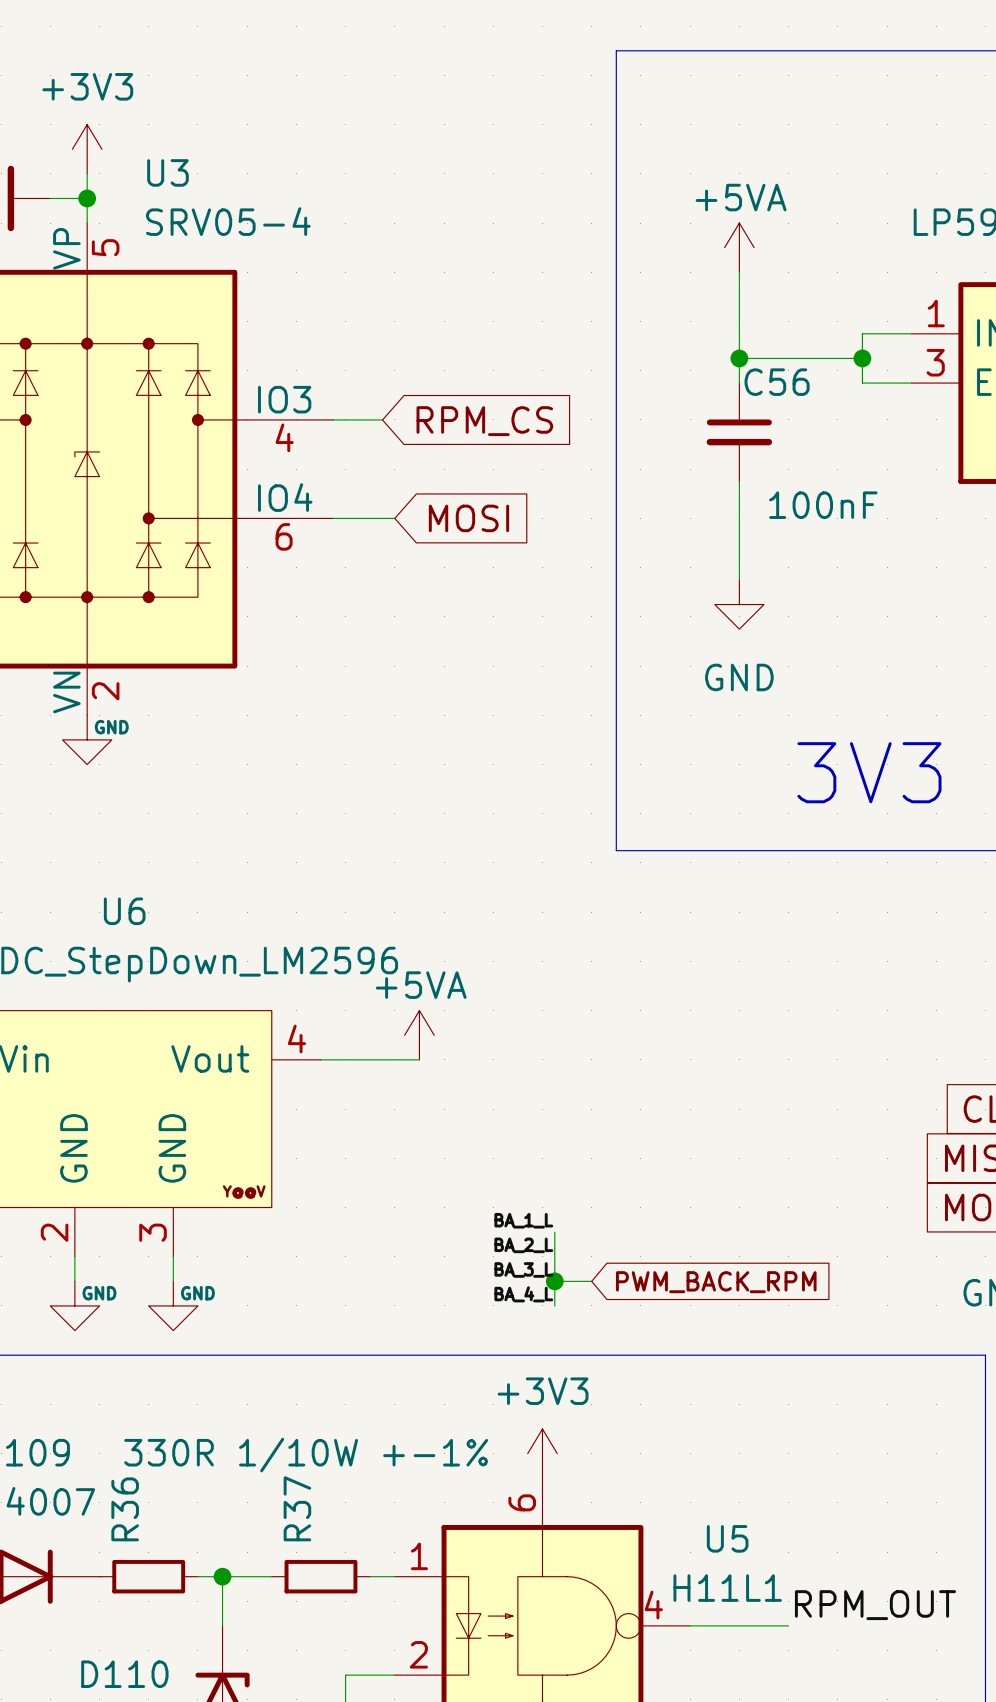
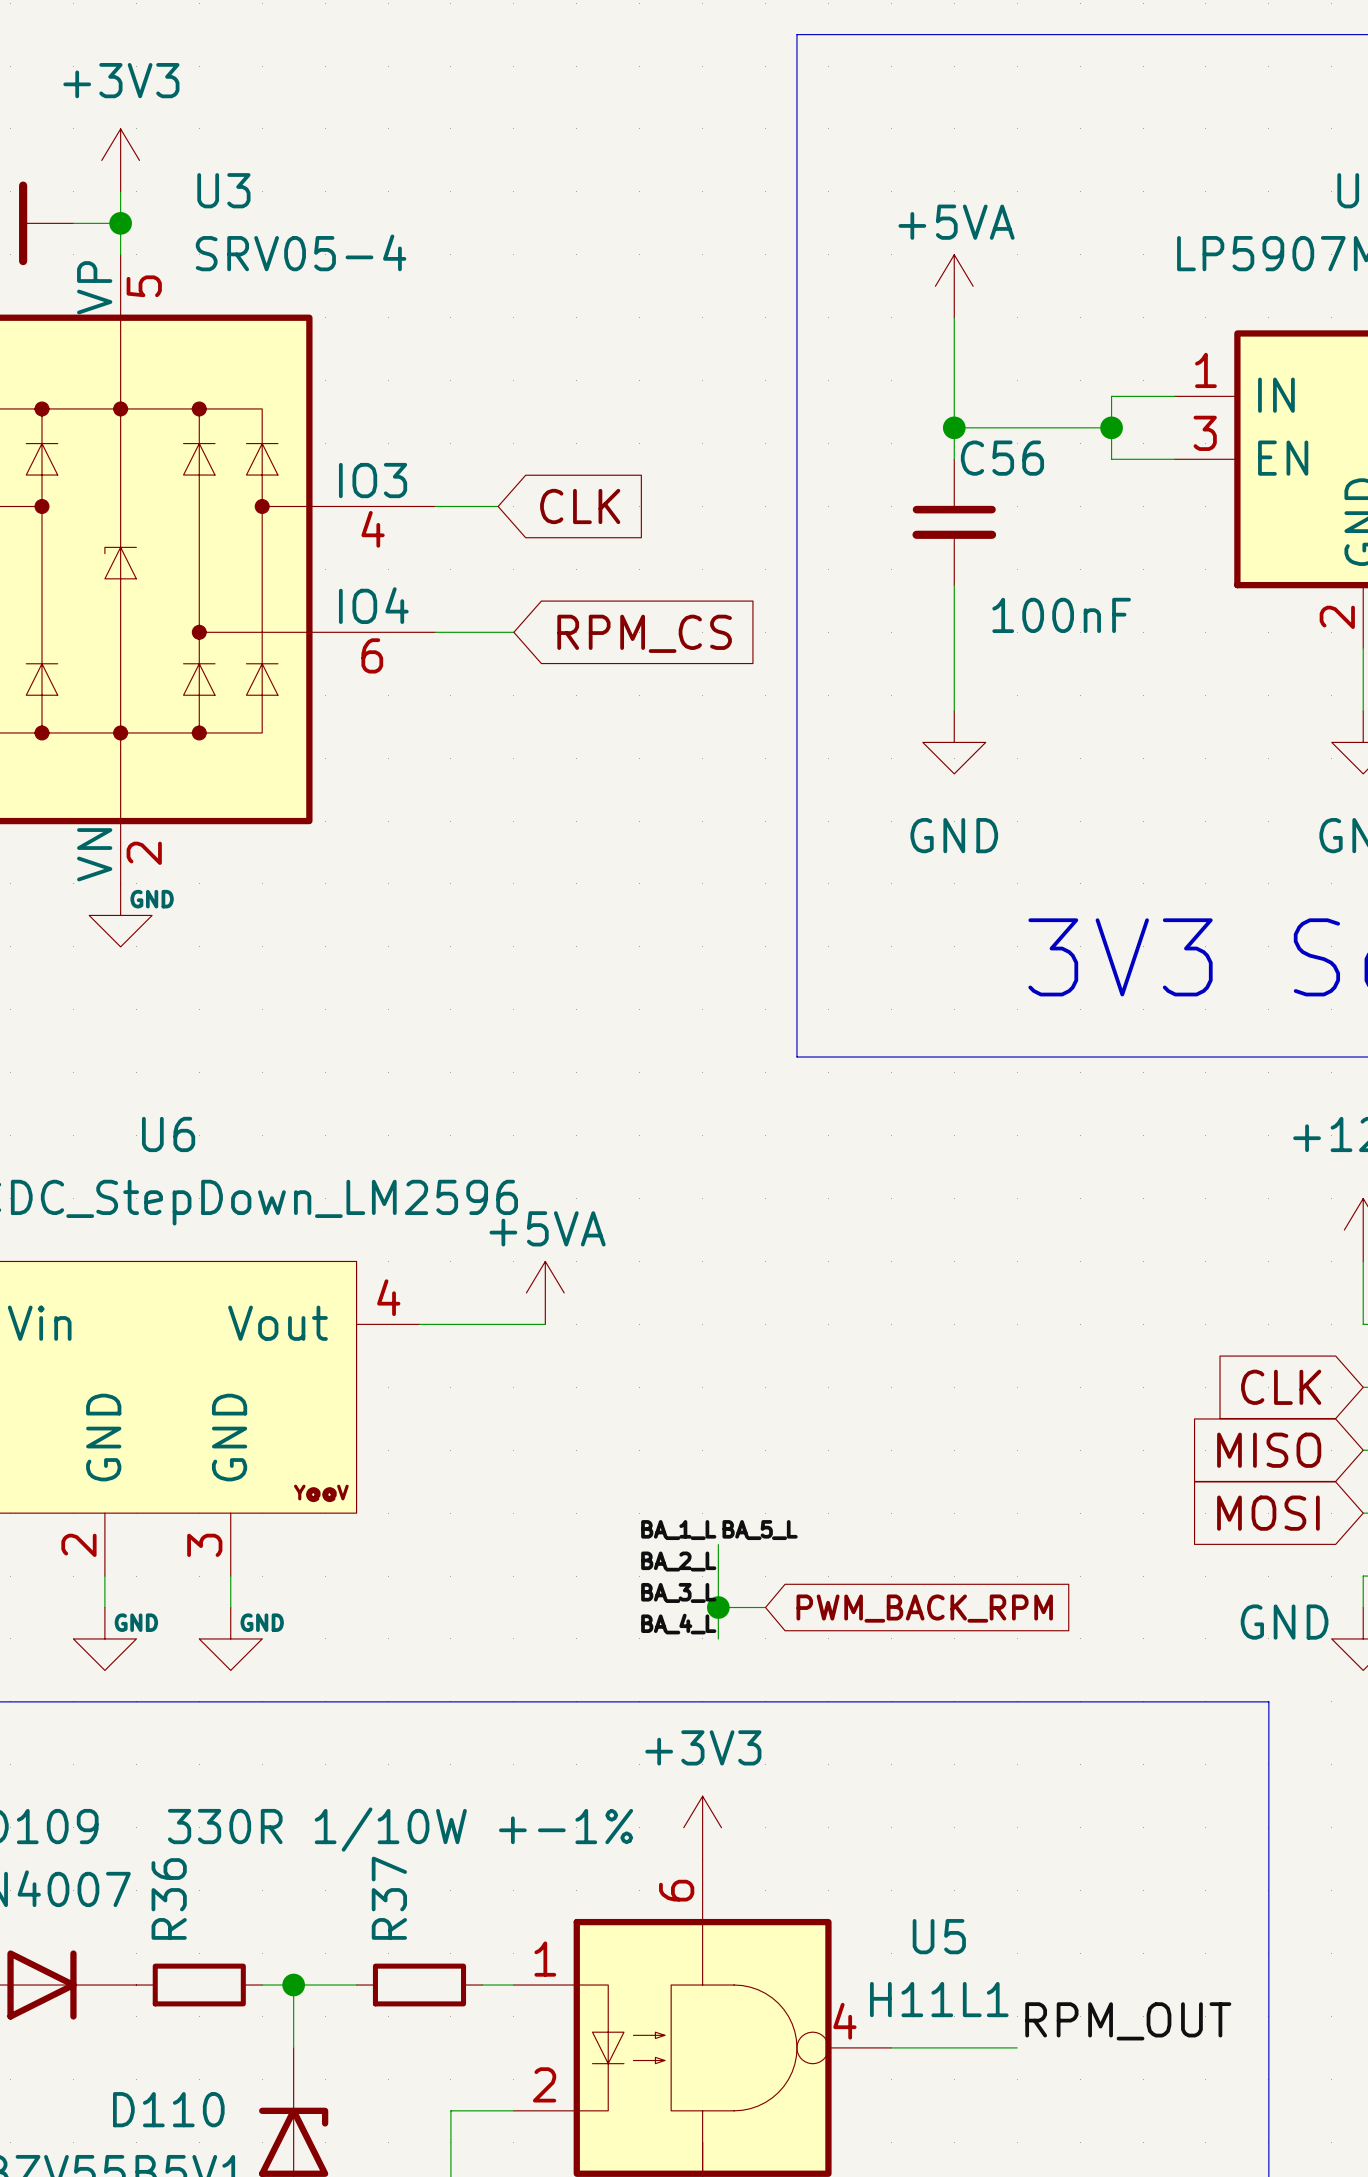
global label: RPM_CS (484, 421) -> CLK (580, 506)
global label: MOSI (468, 518) -> RPM_CS (644, 633)
label: none -> BA_5_L (760, 1530)

